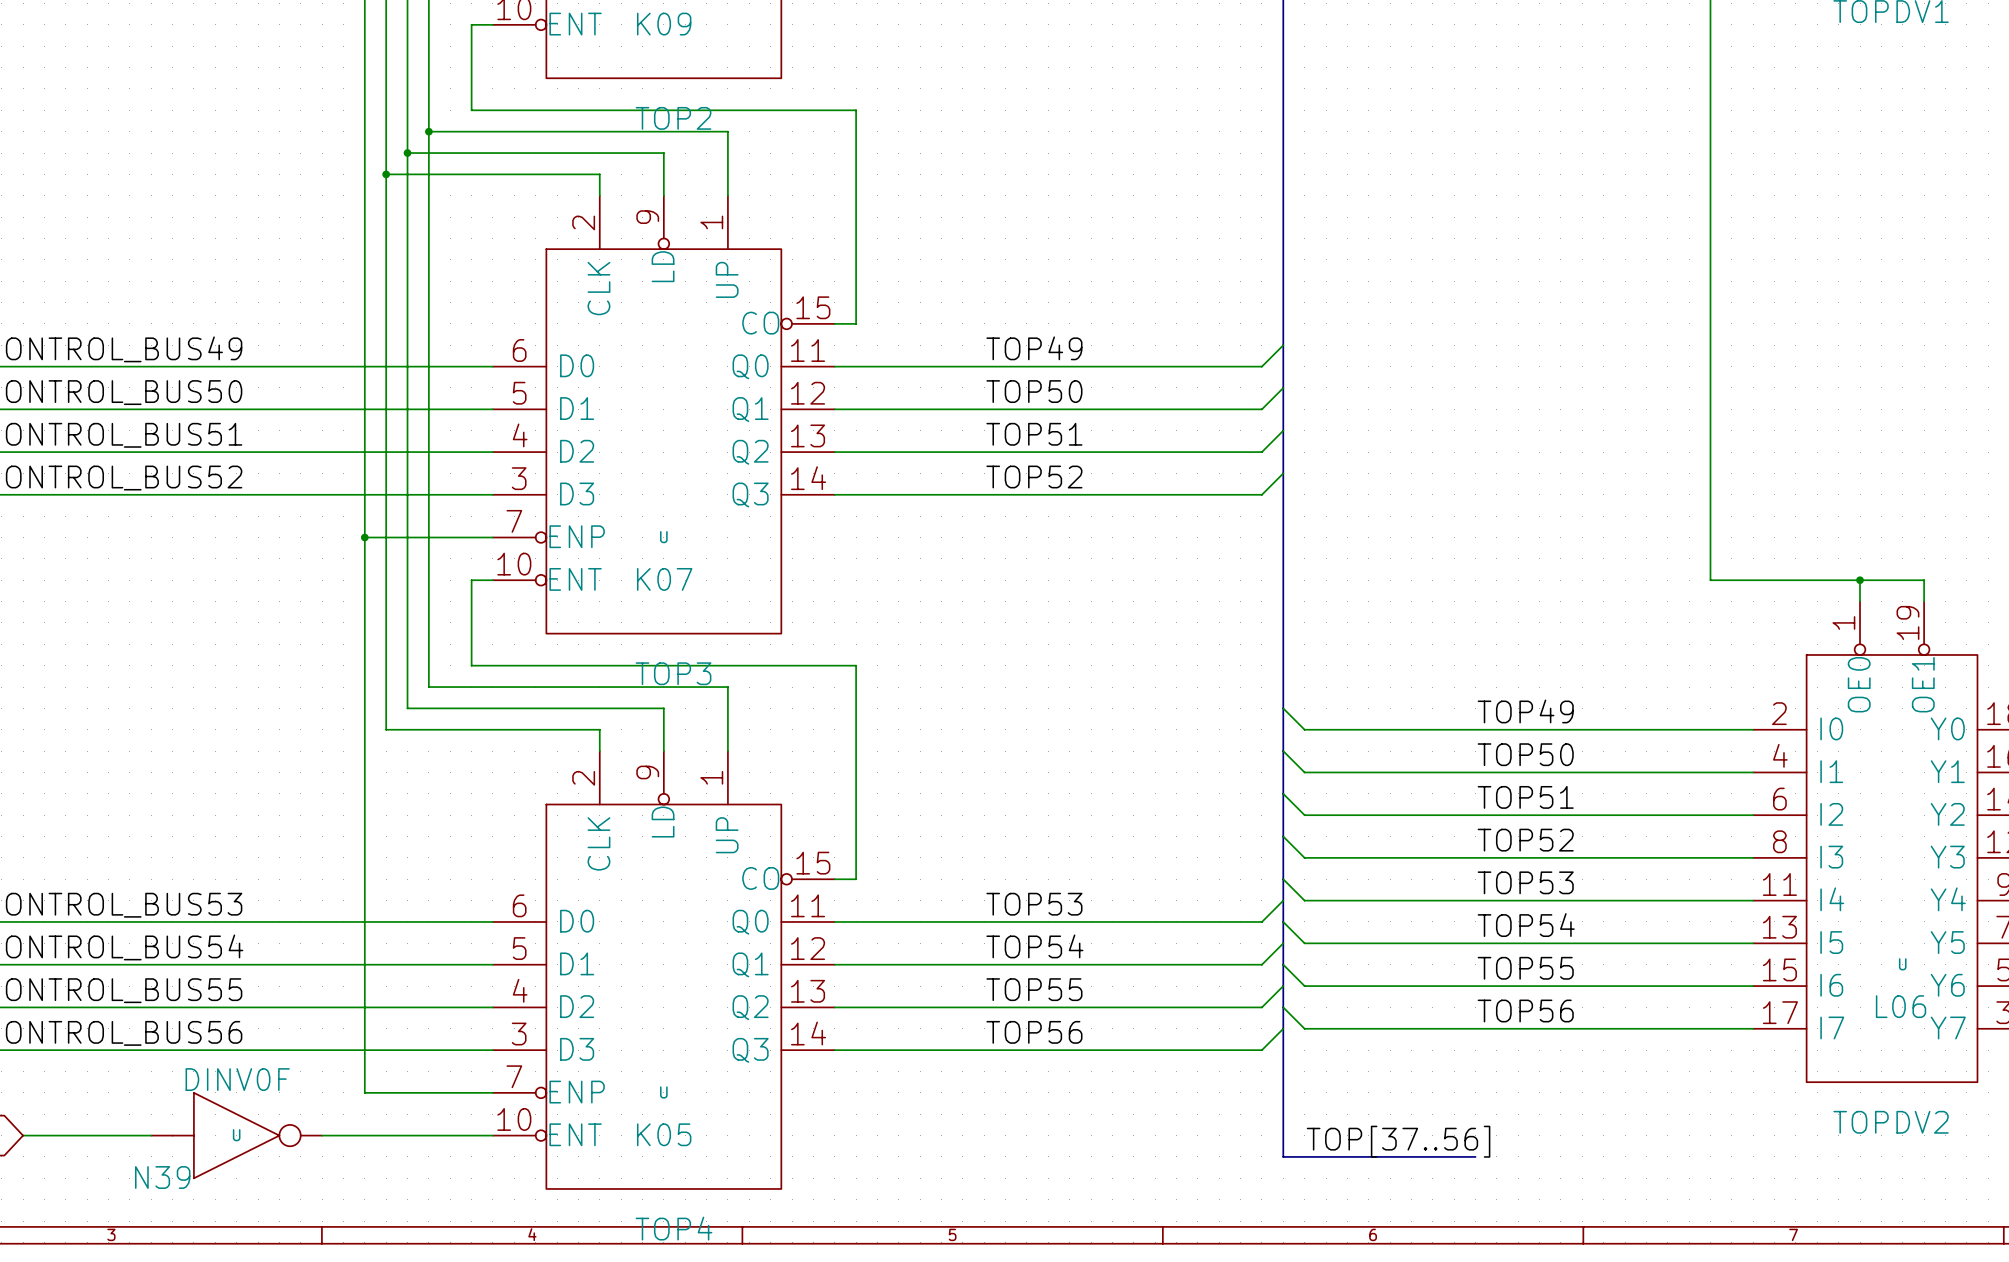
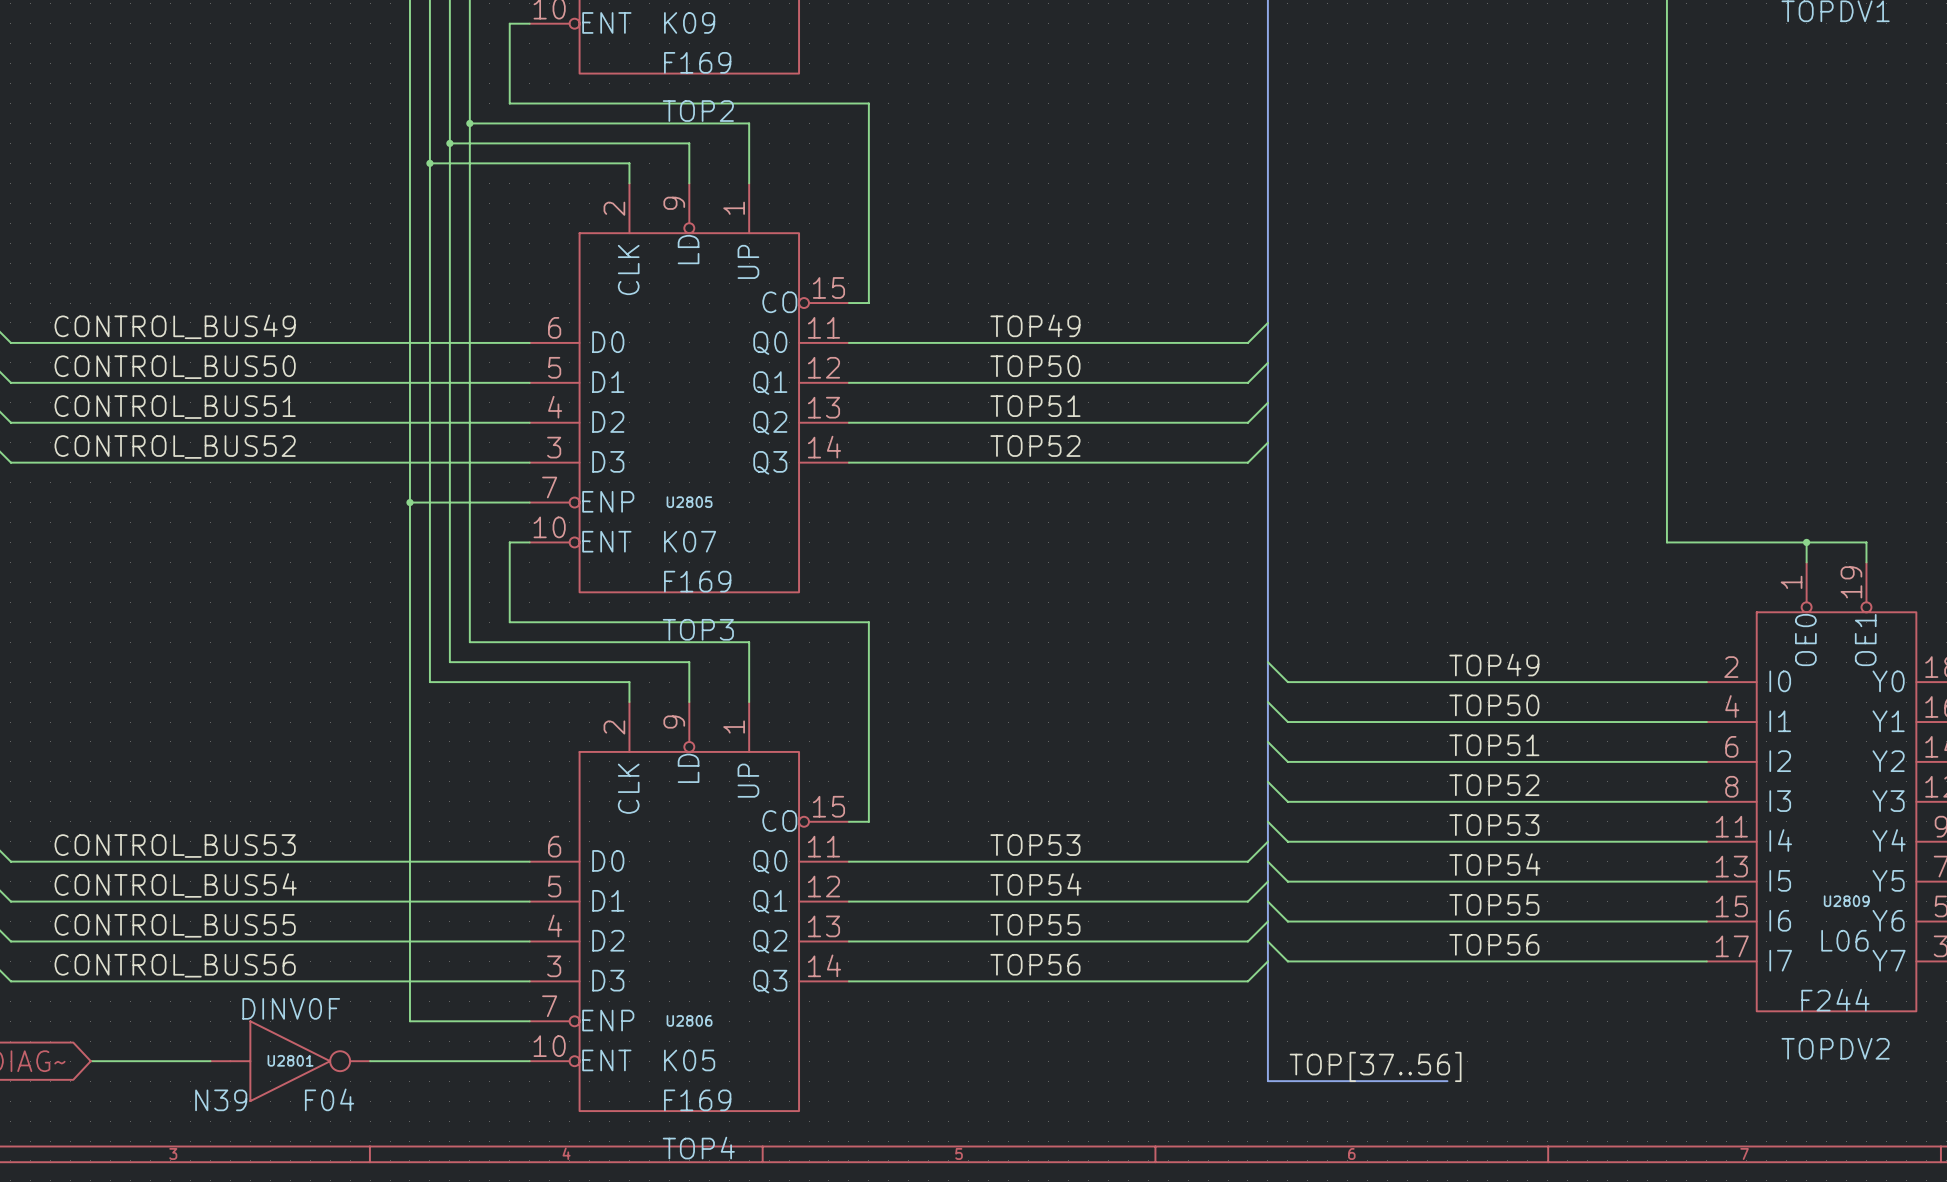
part value: none -> F169 (697, 62)
U name: U (663, 537) -> U2805 (689, 502)
U value: none -> F169 (697, 581)
U name: U (1902, 964) -> U2809 (1846, 901)
U value: none -> F244 (1835, 1000)
U name: U (663, 1092) -> U2806 (689, 1020)
U name: U (236, 1135) -> U2801 (290, 1060)
U value: none -> F04 (329, 1099)
U value: none -> F169 (697, 1100)

